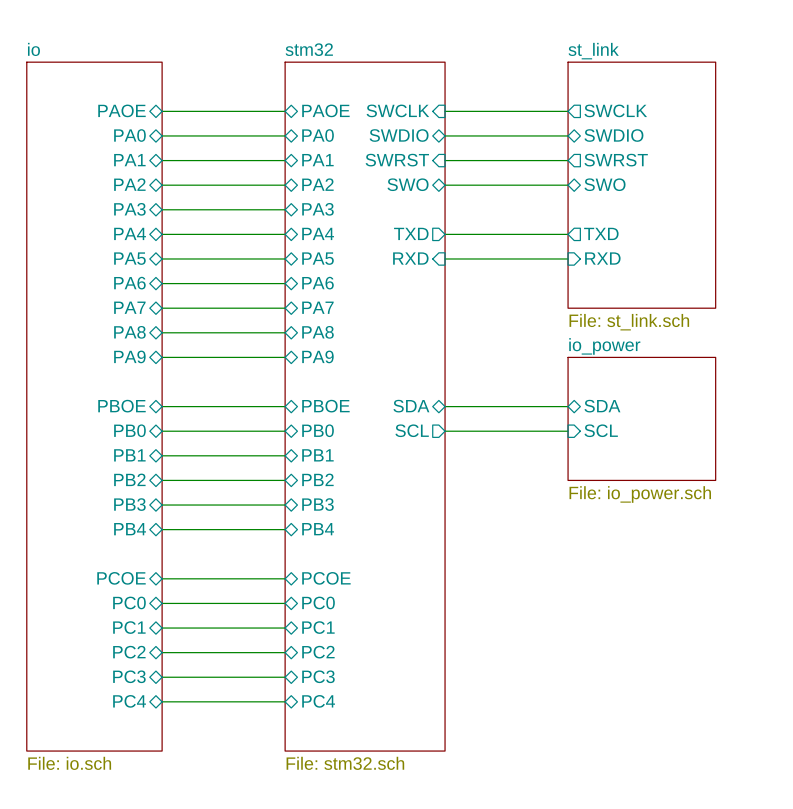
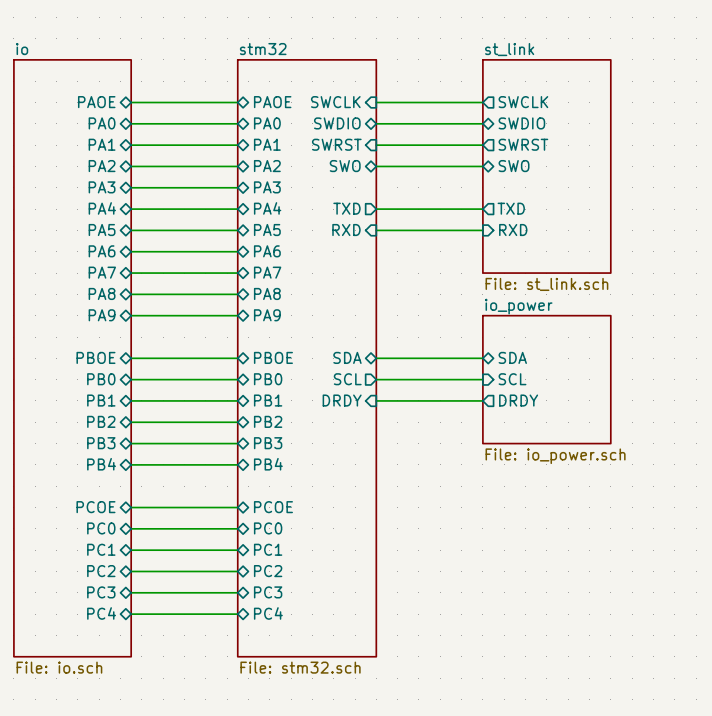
sheet io_power: File: io_power.sch (641, 418) -> none
sheet io_power: none -> File: io_power.sch (546, 379)
sheet pin: none -> DRDY (342, 400)
wire: none -> (376, 400) (482, 400)
sheet pin: none -> DRDY (518, 400)

